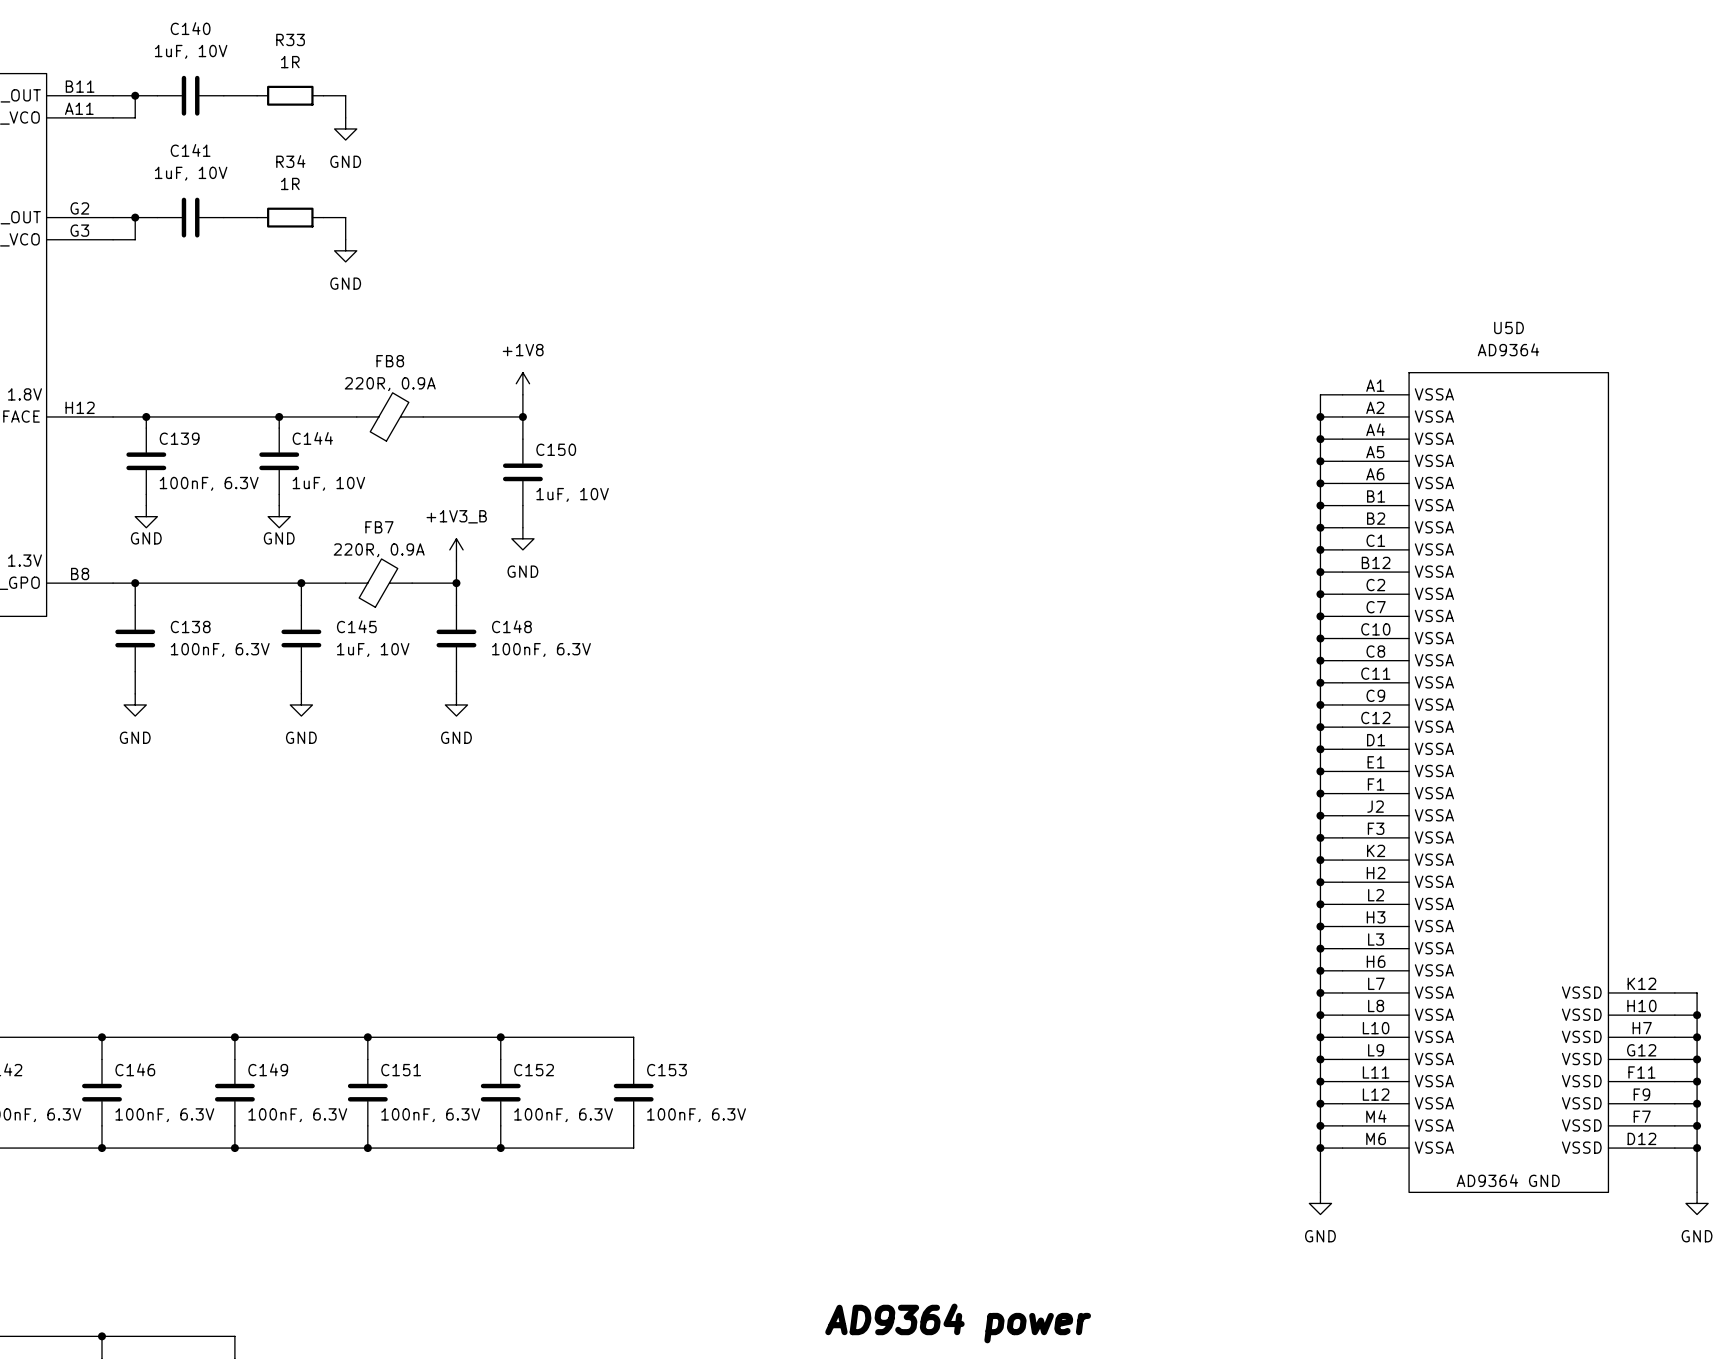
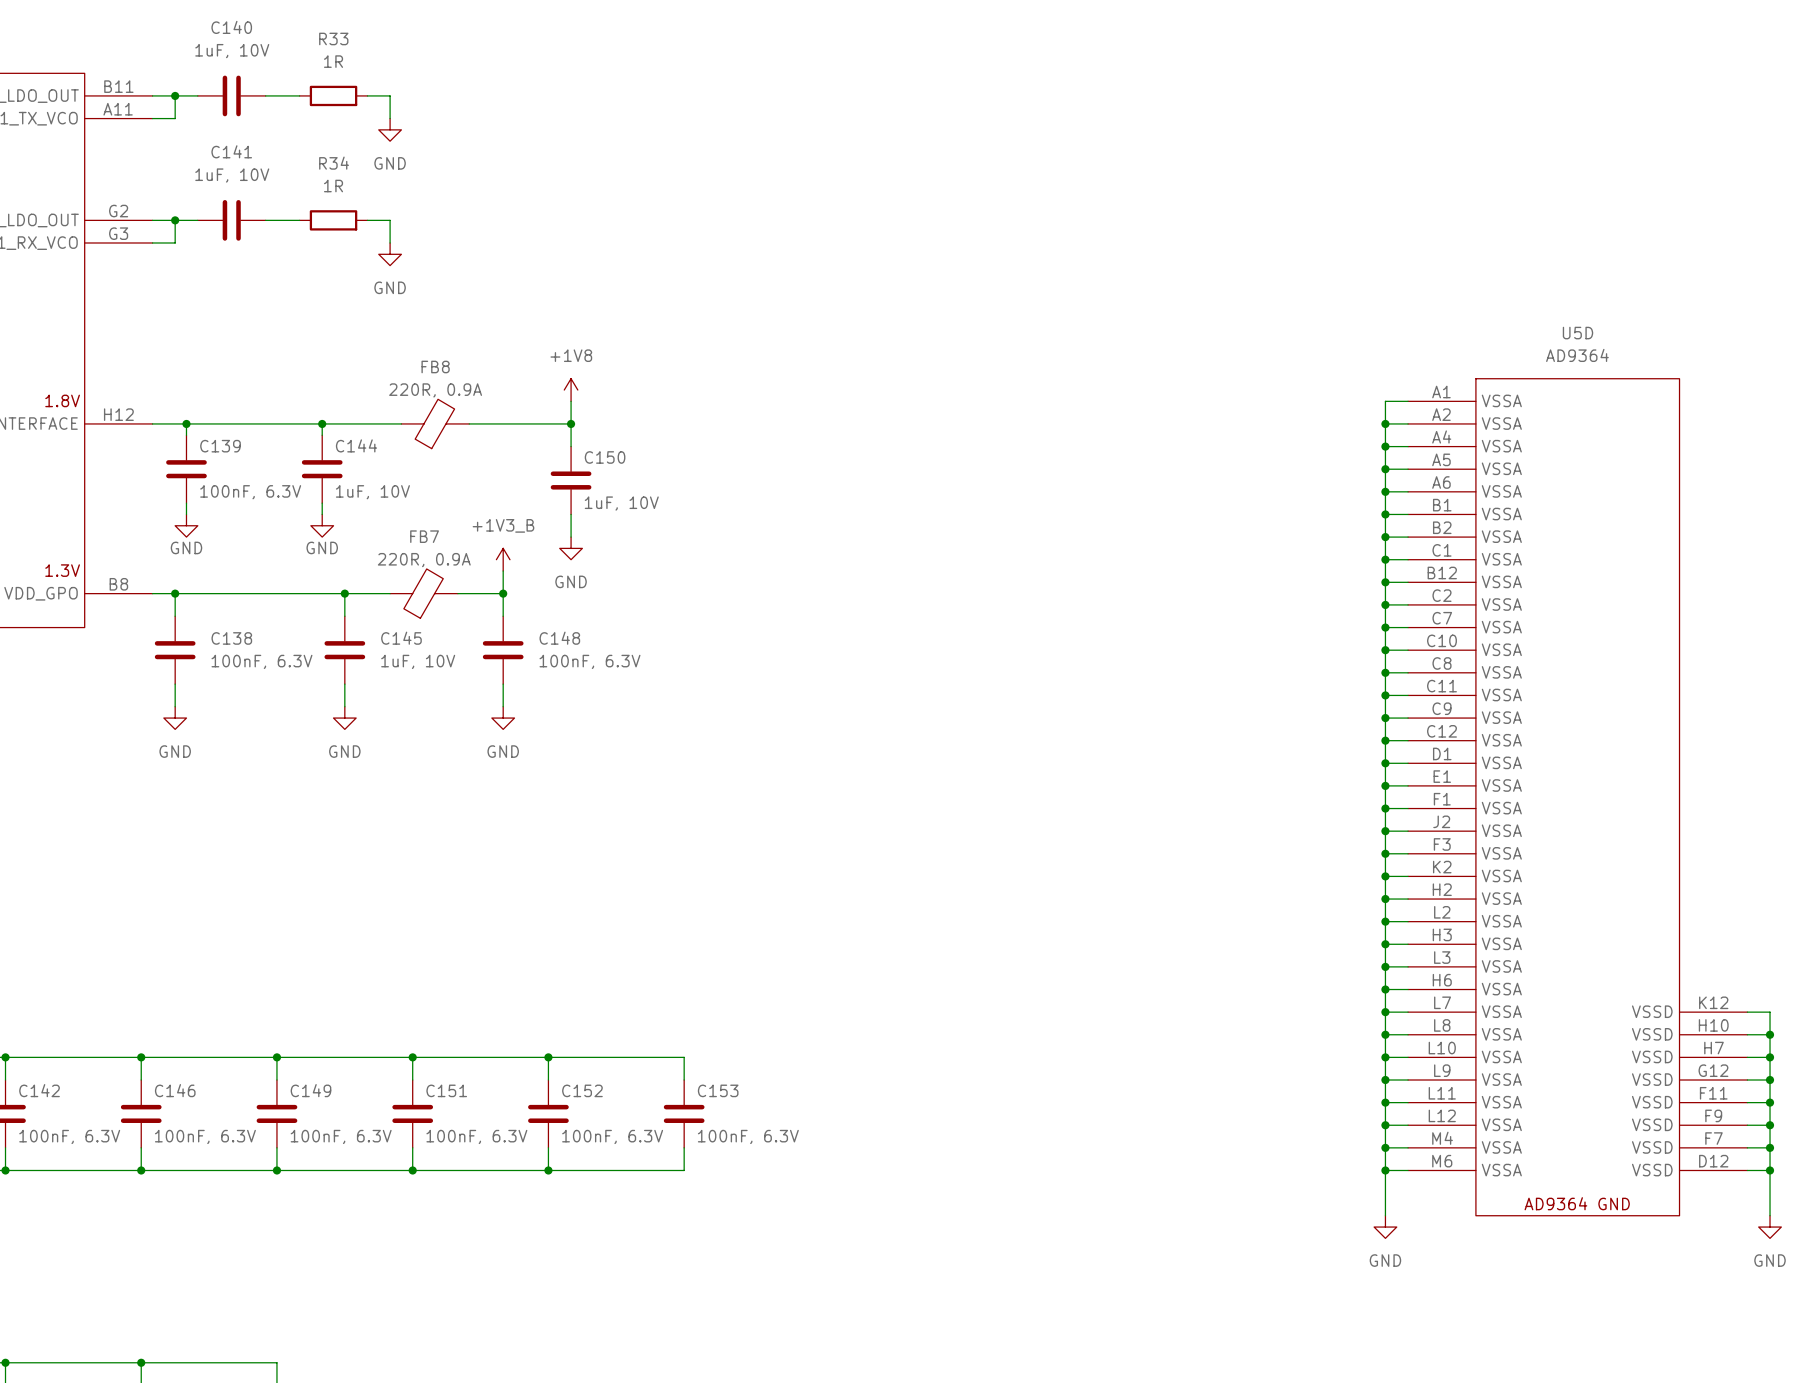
text: AD9364 power (958, 1323) -> none

